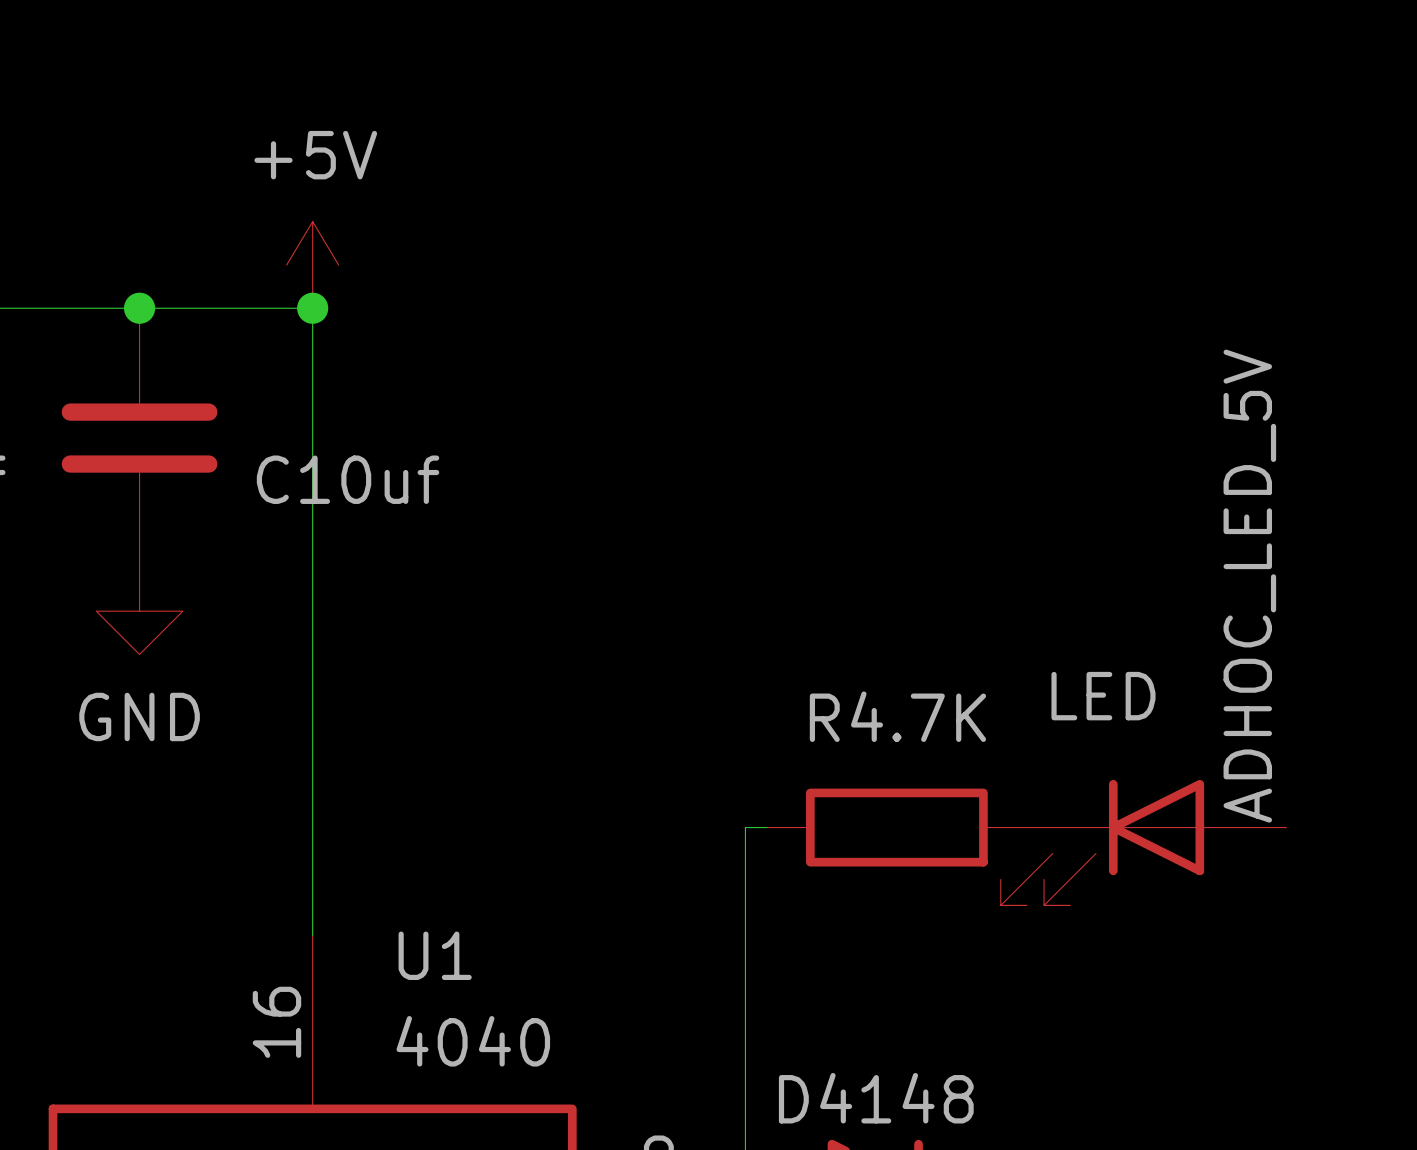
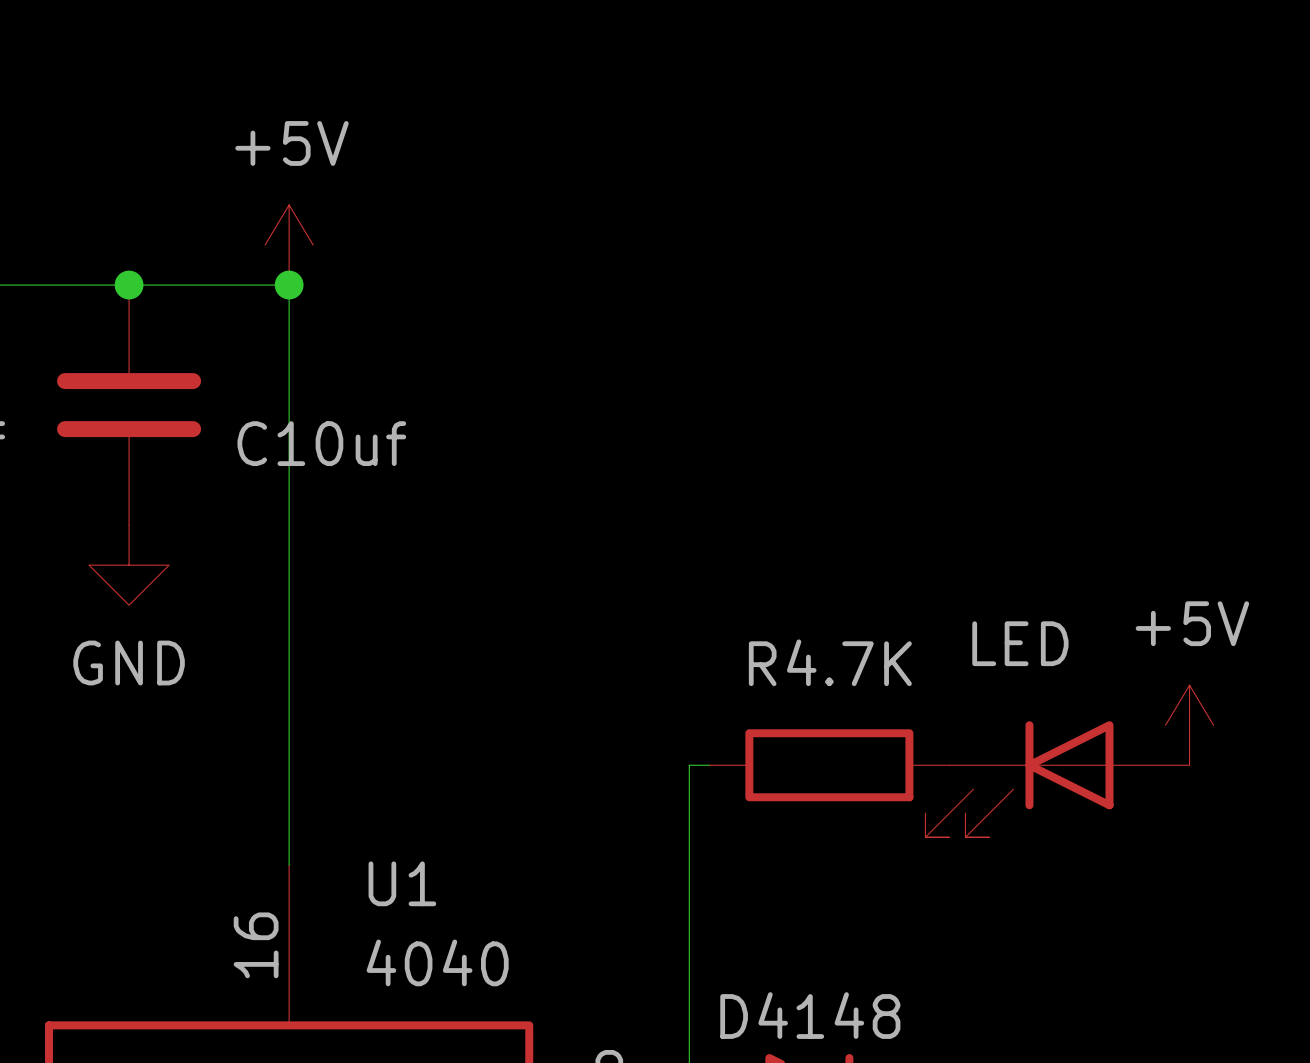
label: ADHOC_LED_5V (1249, 586) -> none
power symbol: none -> +5V (1189, 725)

